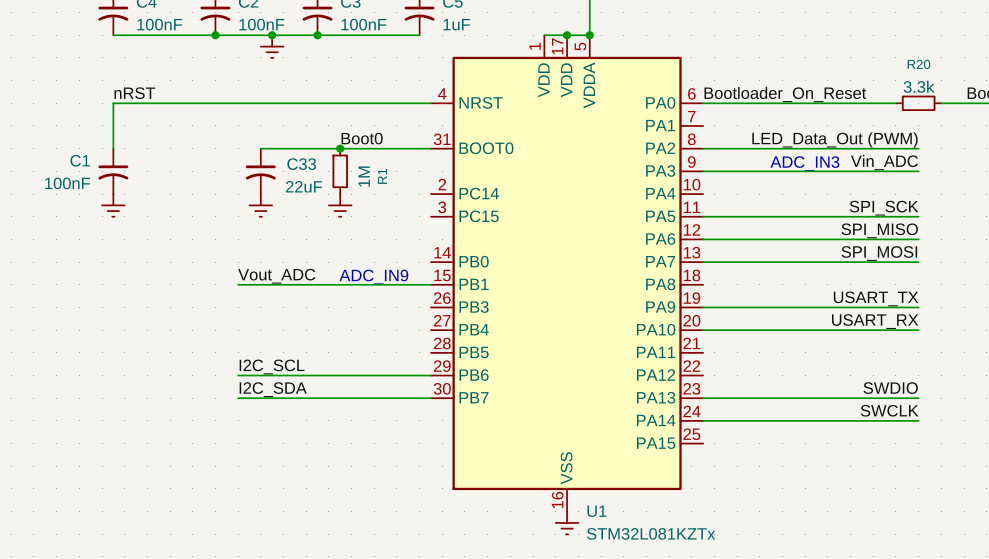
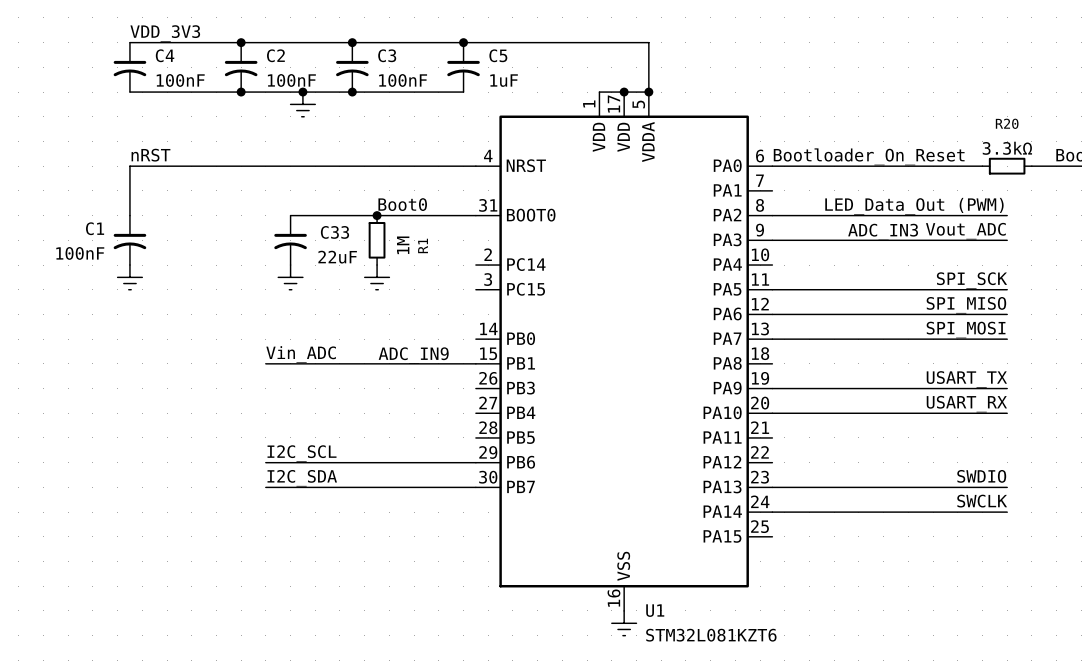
R20 value: 3.3k (918, 86) -> 3.3kΩ (1007, 148)
label: Vin_ADC (884, 162) -> Vout_ADC (965, 231)
label: Vout_ADC (276, 276) -> Vin_ADC (301, 354)
U1 value: STM32L081KZTx (651, 533) -> STM32L081KZT6 (711, 635)

